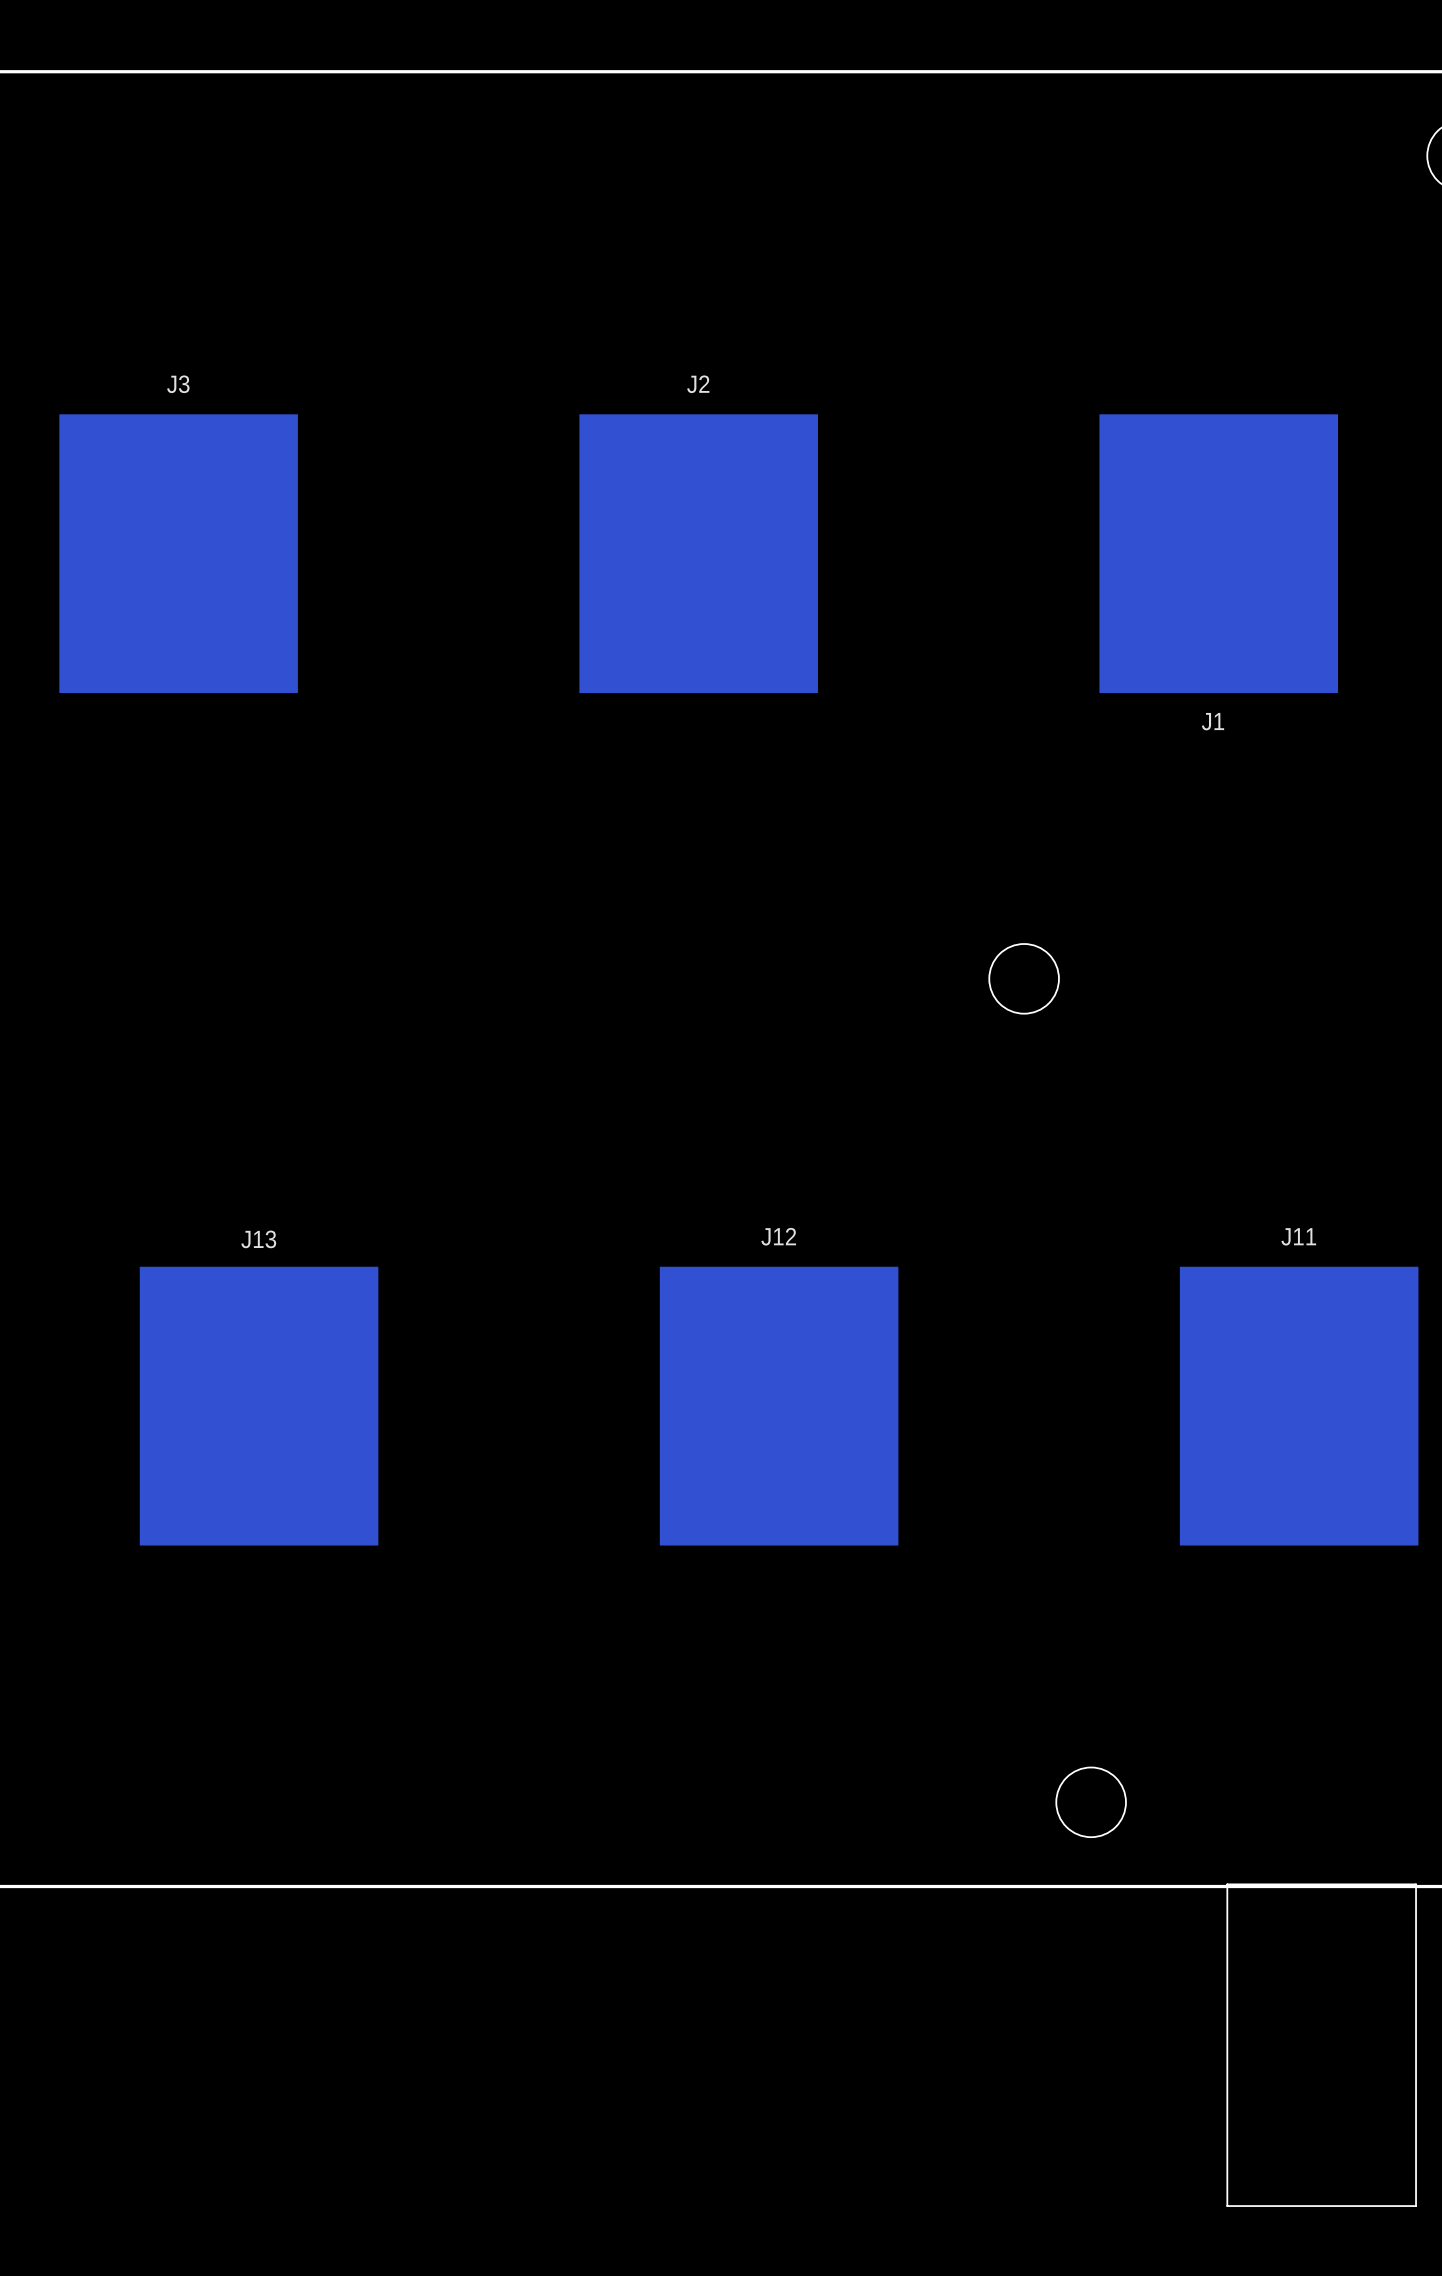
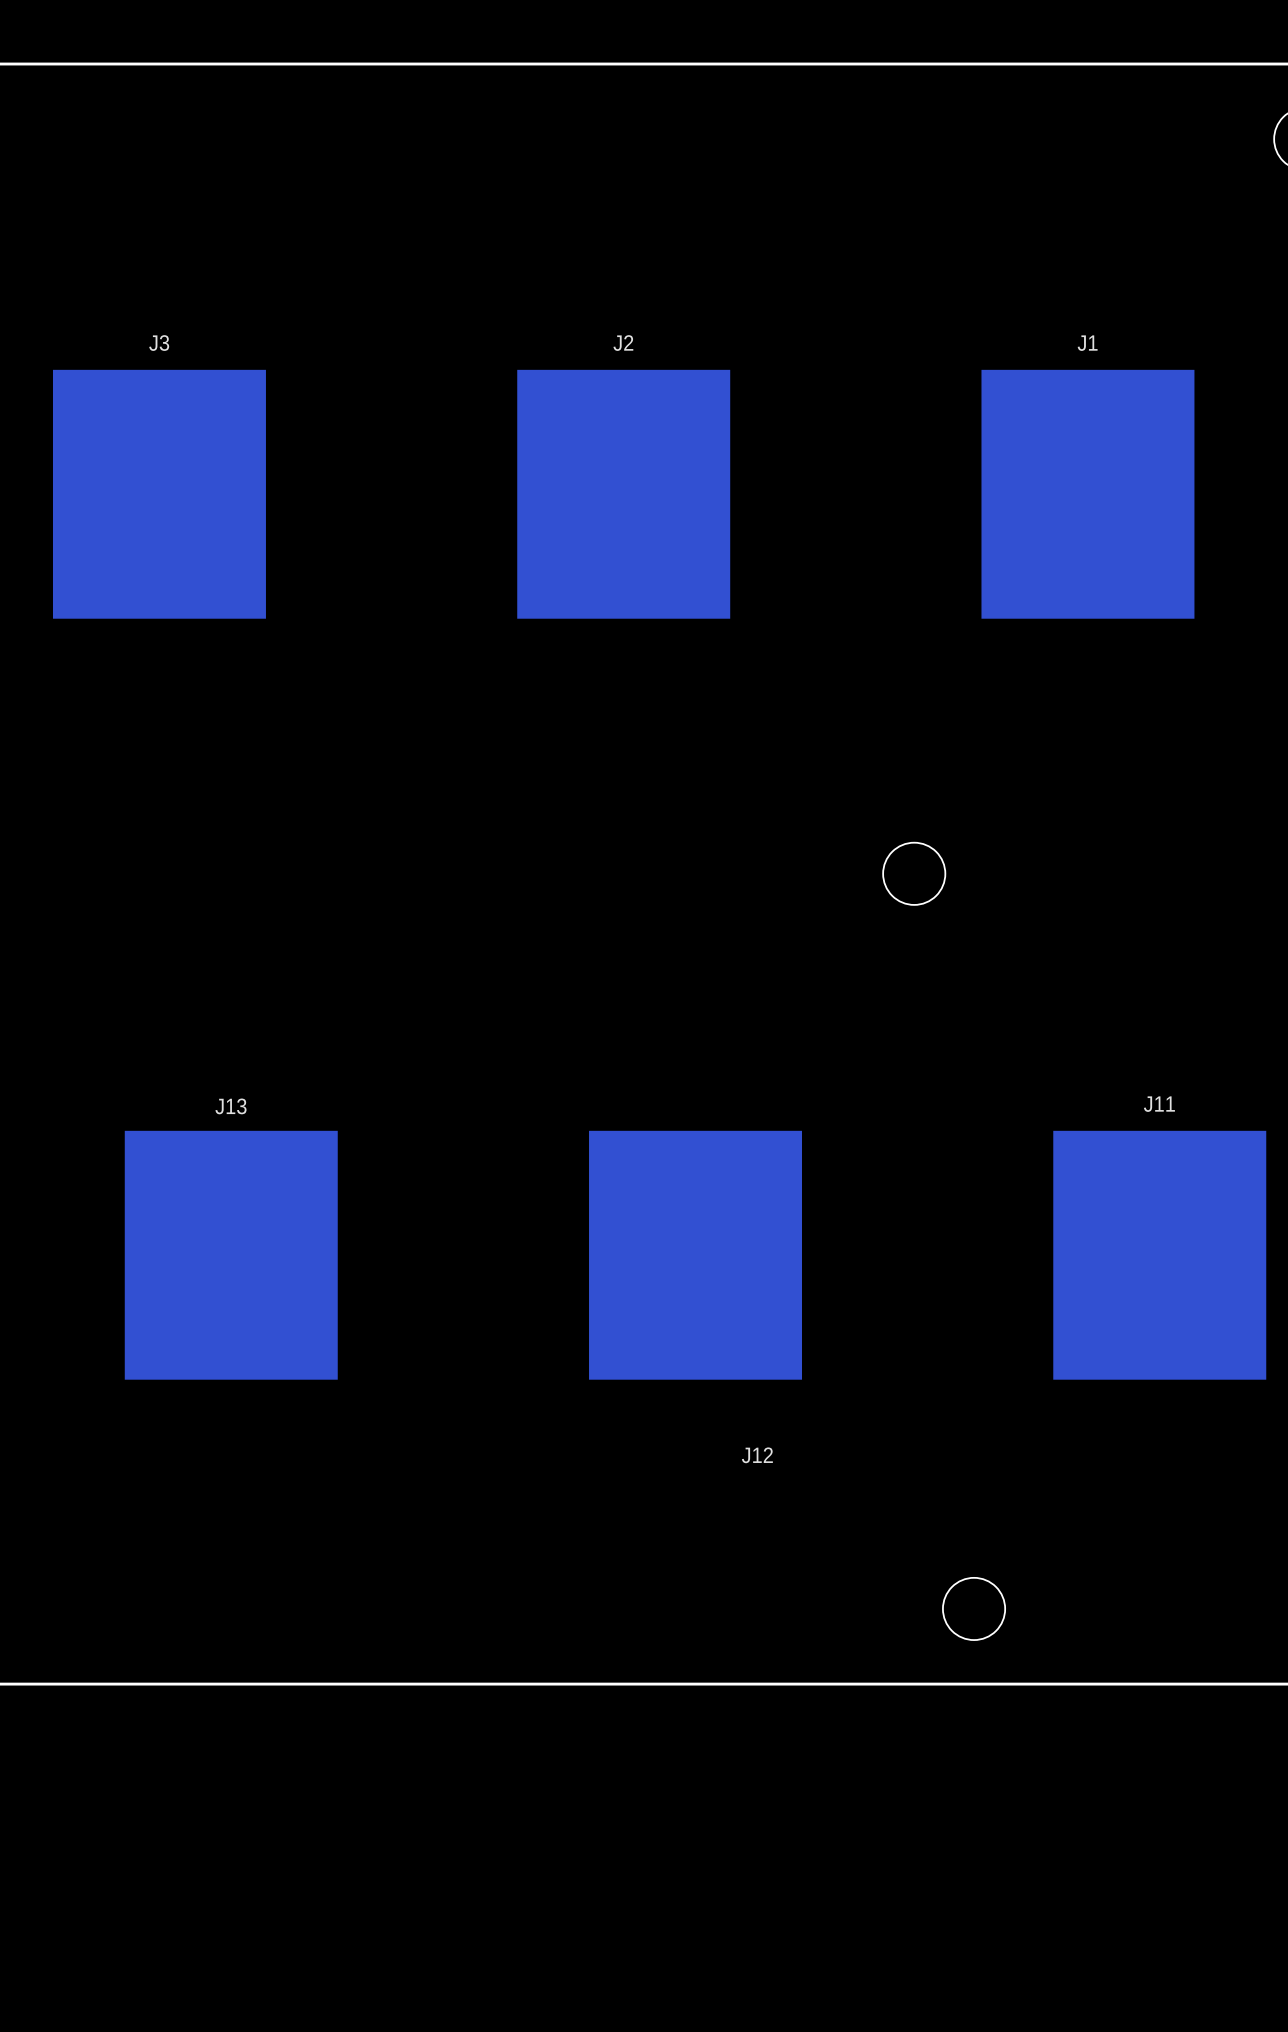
J1 name position: J1 (1213, 721) -> J1 (1087, 343)
J12 name position: J12 (778, 1236) -> J12 (757, 1455)
part: (1321, 2045) -> none

